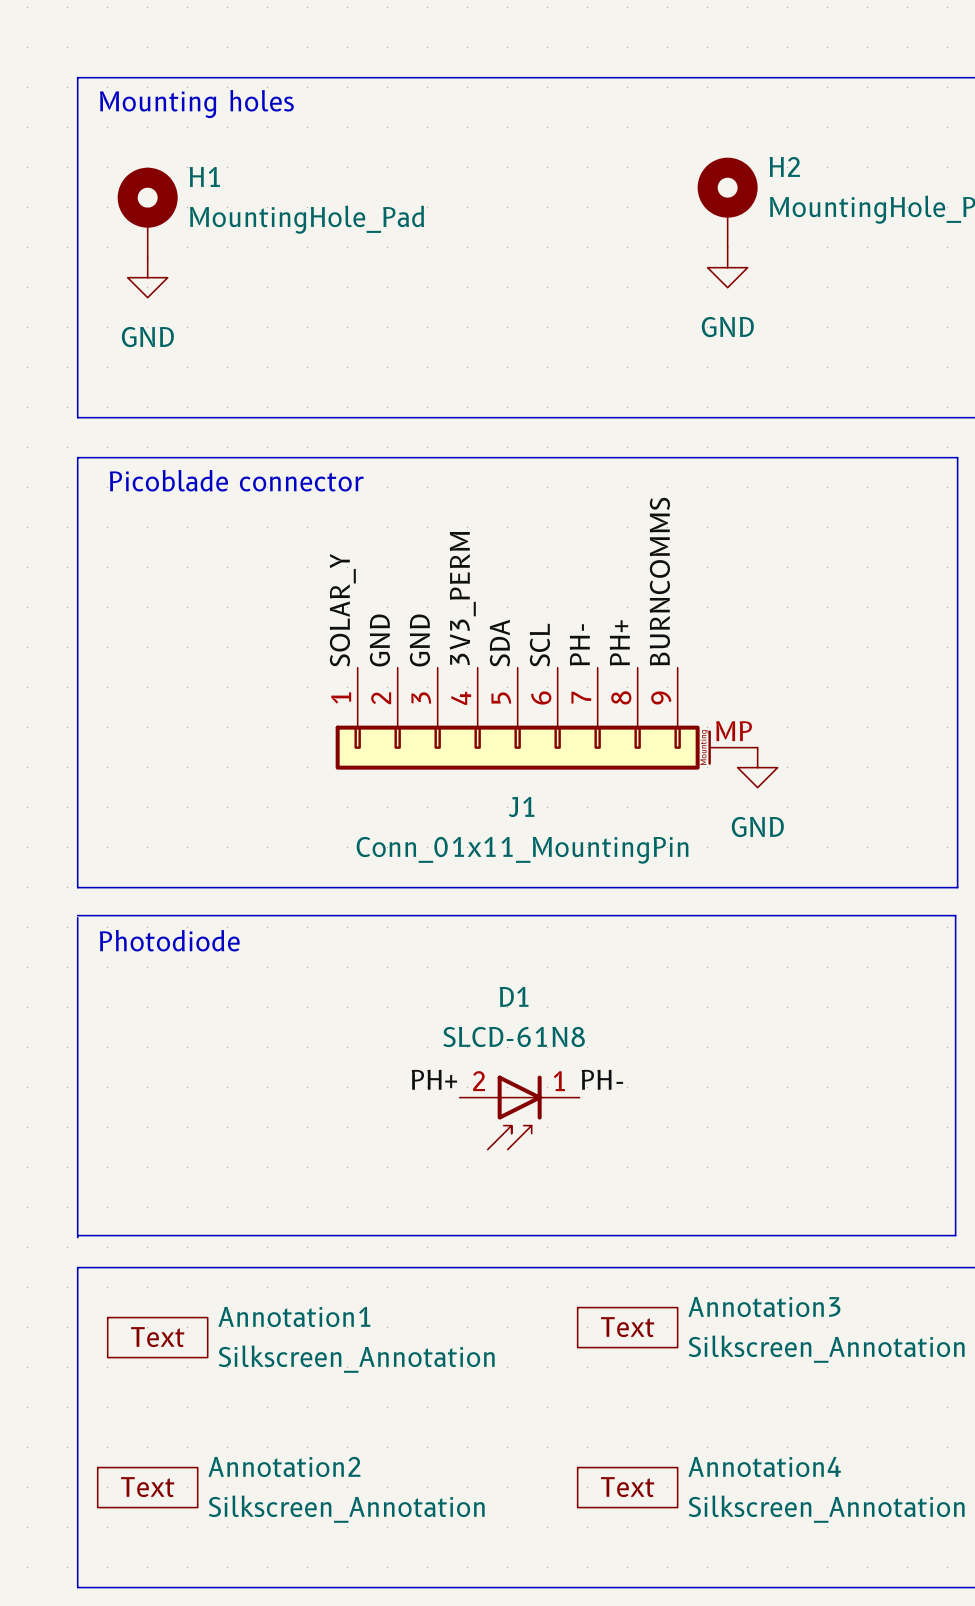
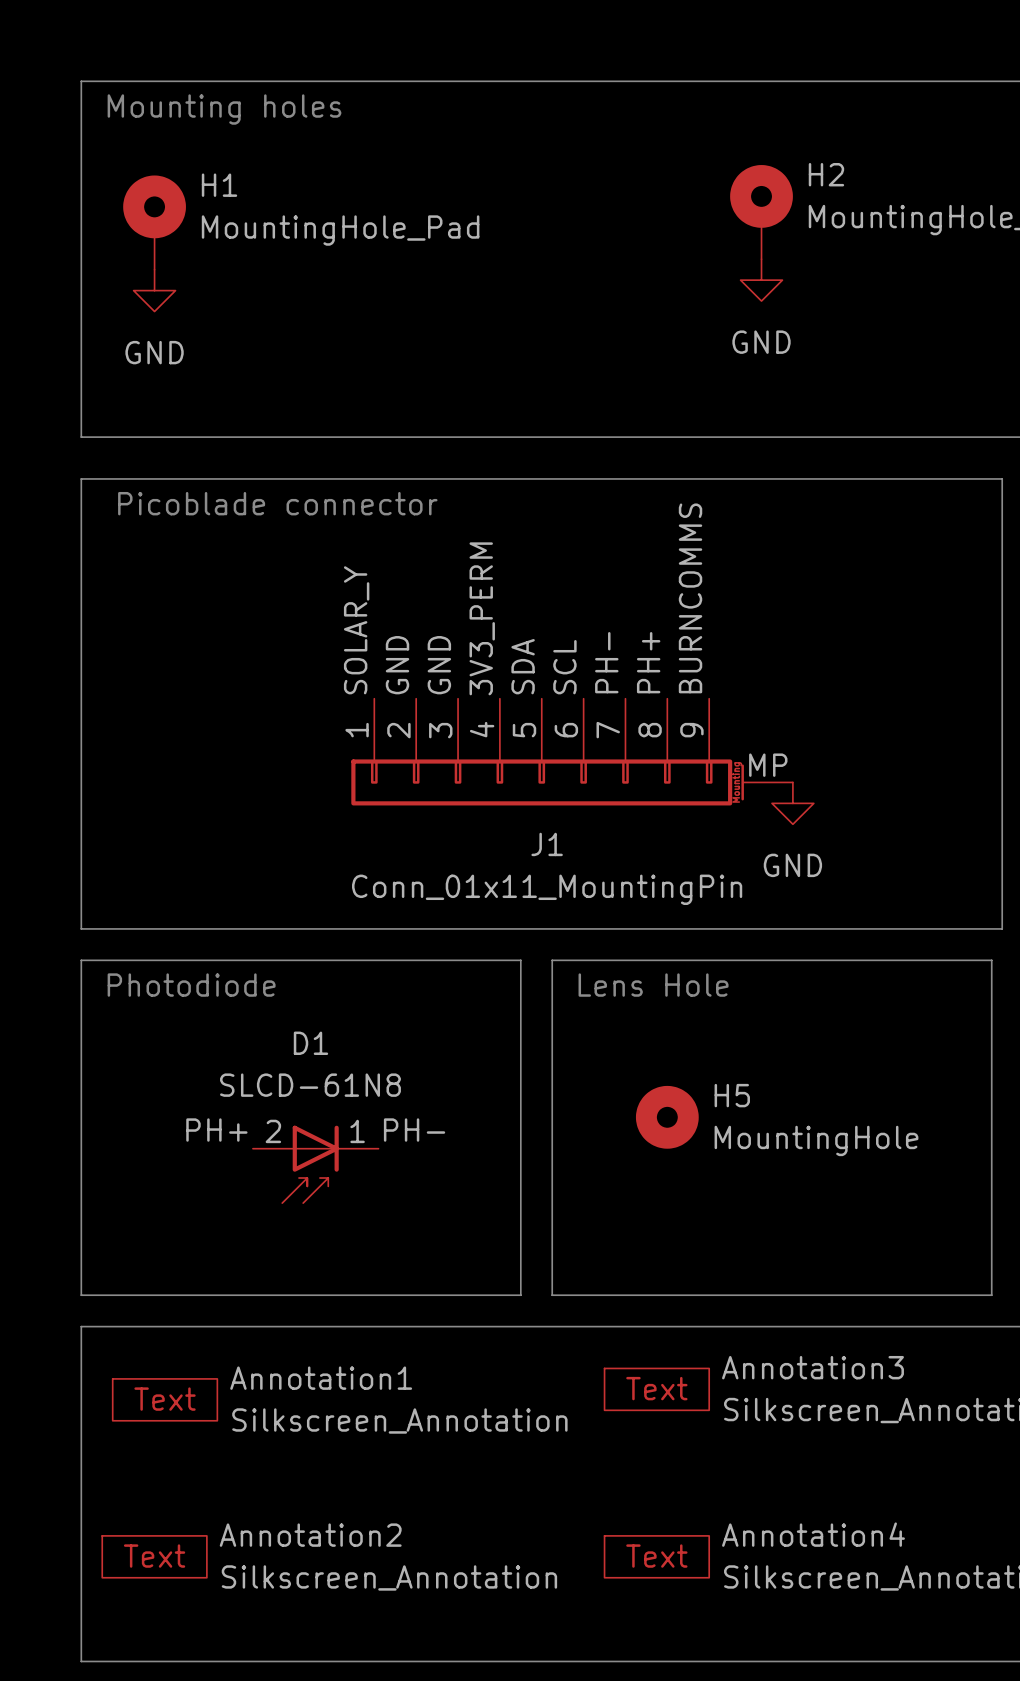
line: (77, 915) (955, 915) (955, 1235) (77, 1235) -> none
line: none -> (81, 960) (520, 960) (520, 1295) (81, 1295)
line: none -> (552, 960) (991, 960) (991, 1295) (552, 1295) (552, 960)
text: none -> Lens Hole (653, 985)
H5: none -> MountingHole (667, 1117)
label position: PH+ (434, 1079) -> PH+ (216, 1130)
label position: PH- (602, 1079) -> PH- (414, 1130)
D1 position: (519, 1112) -> (315, 1164)

